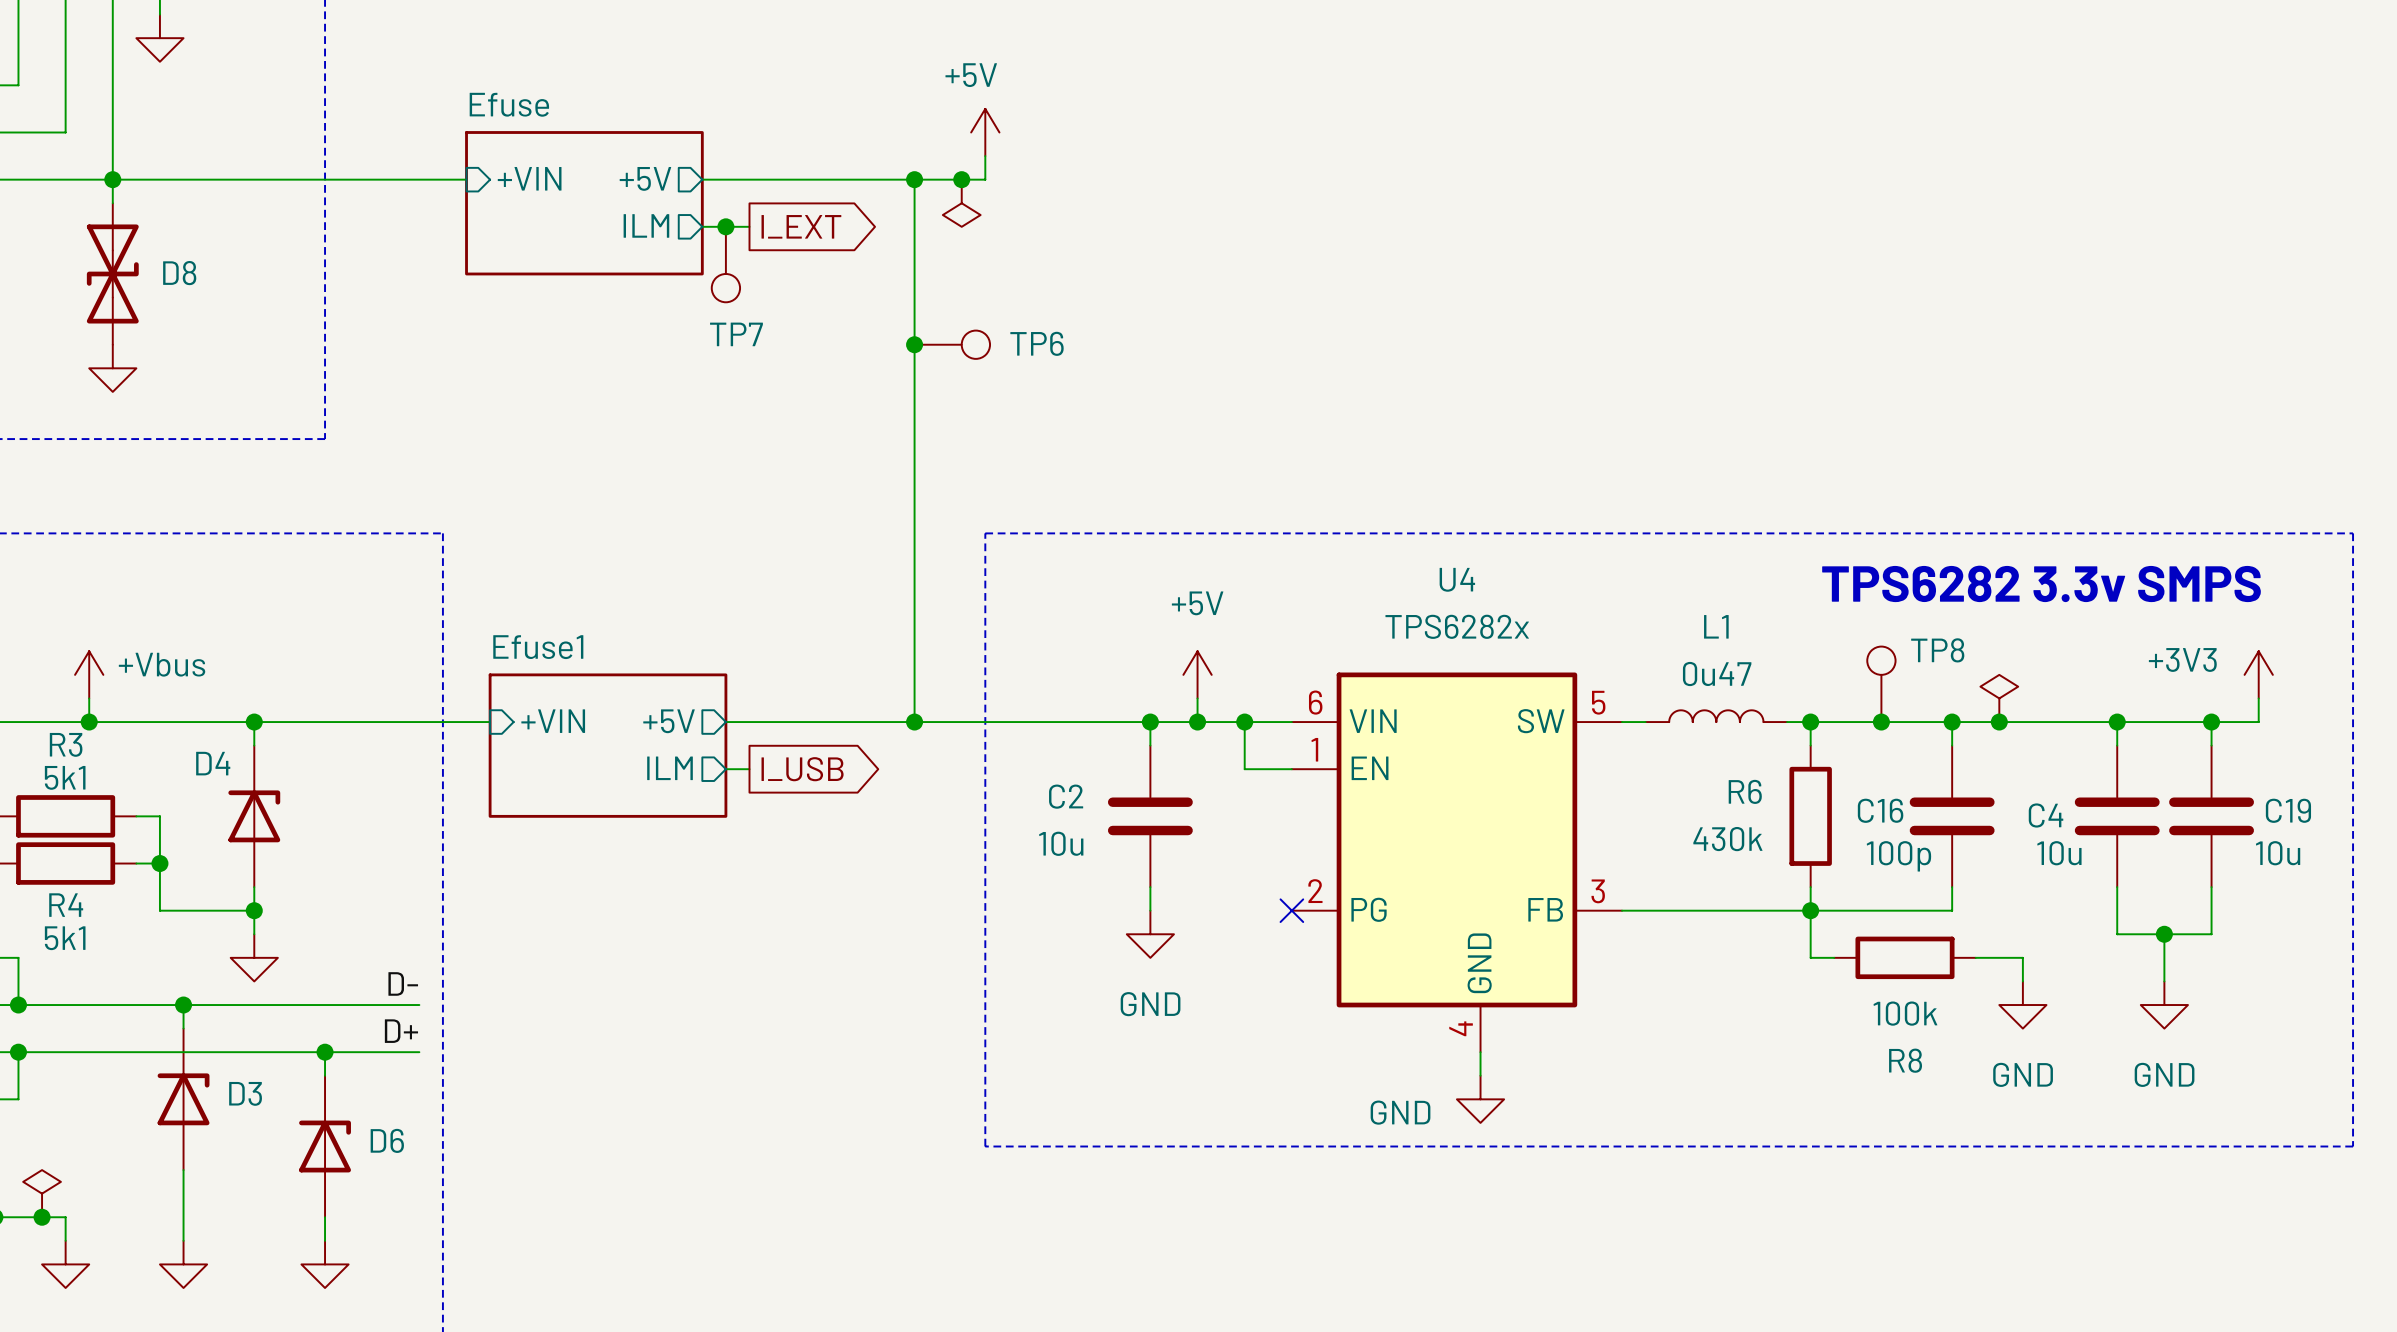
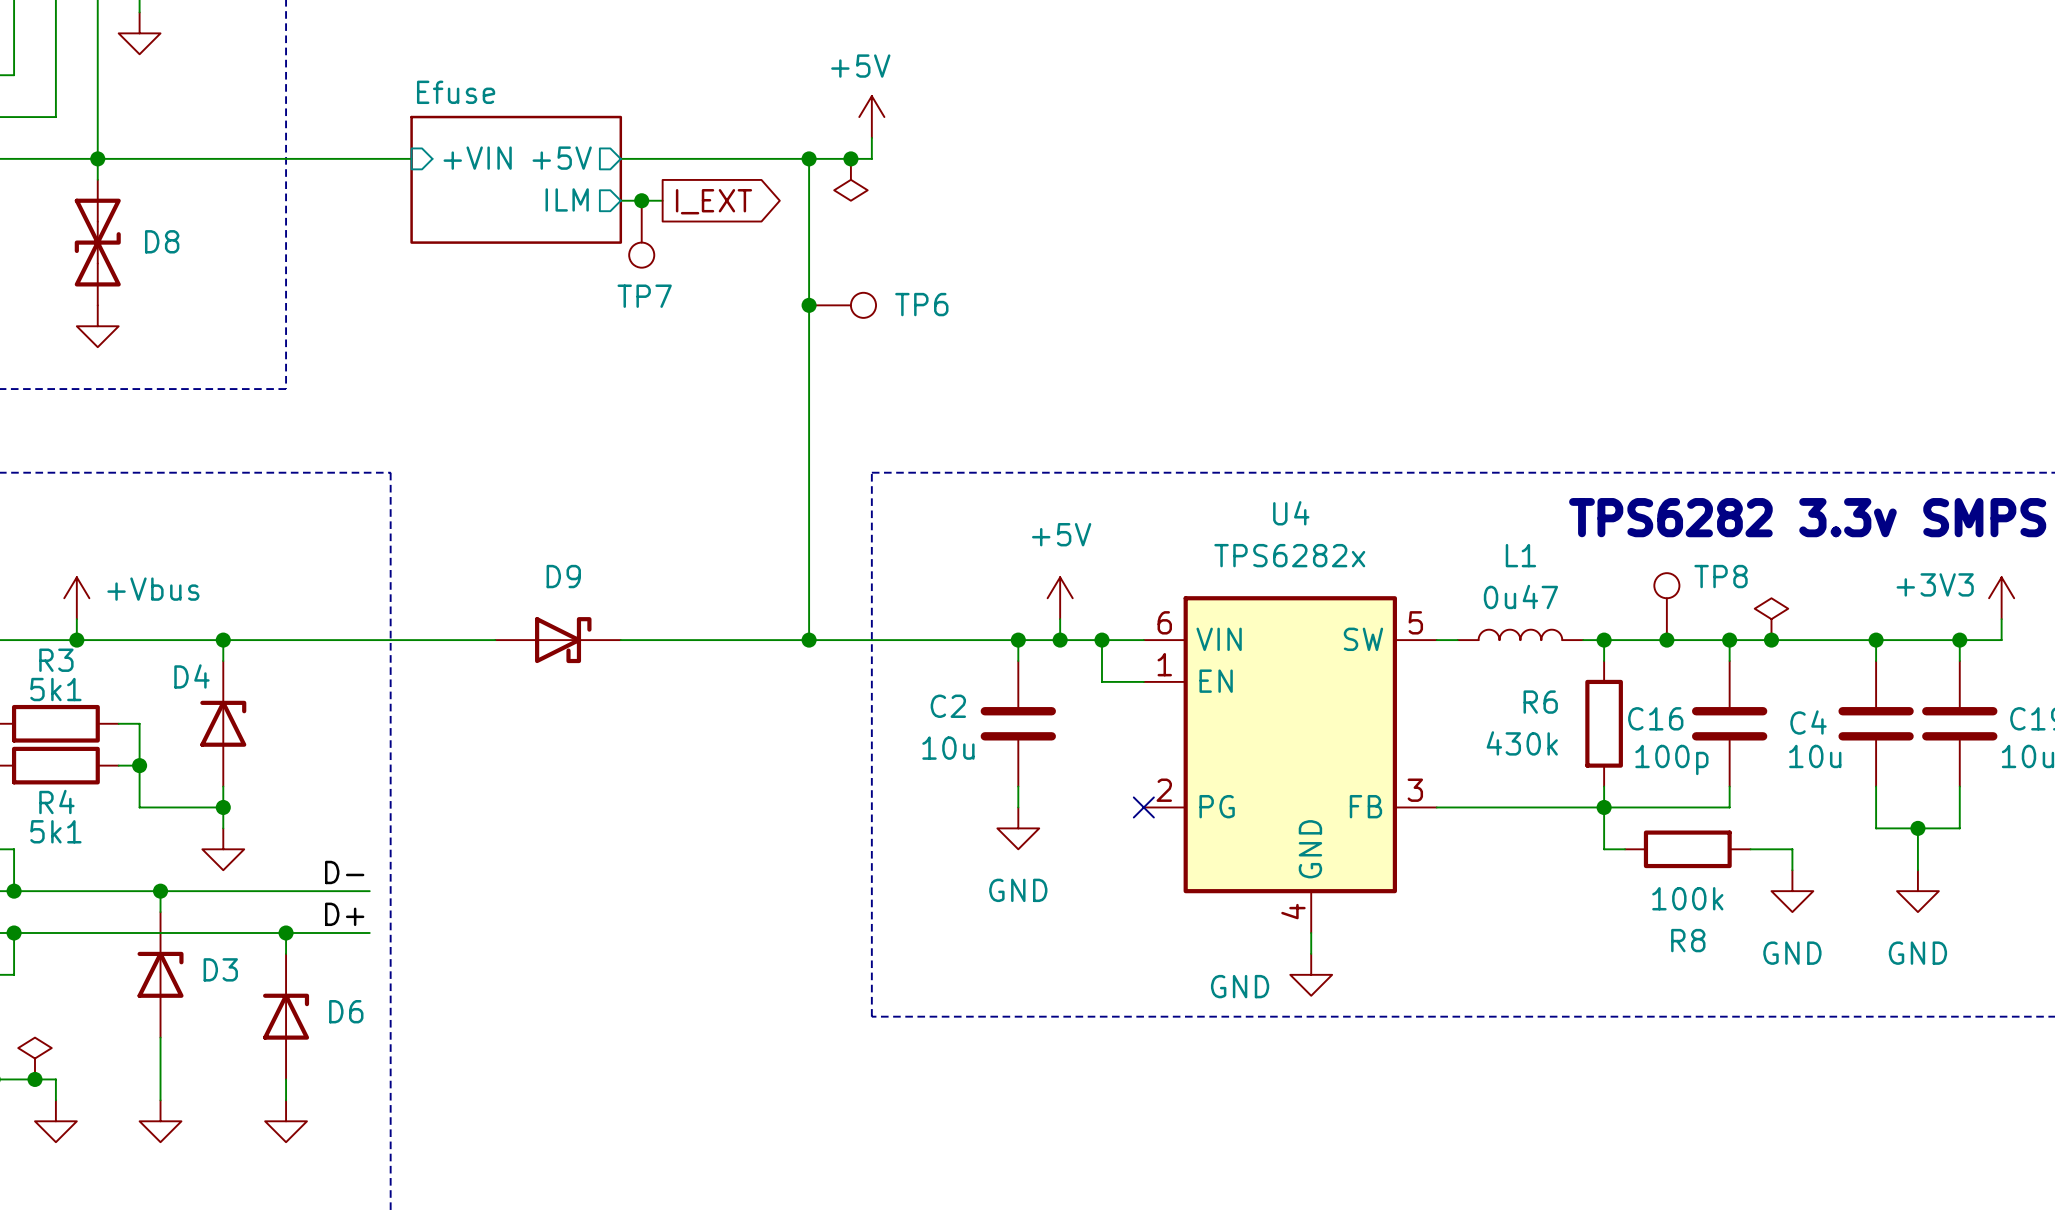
sheet pin: +VIN (553, 721) -> none
sheet pin: +5V (669, 721) -> none
wire: none -> (432, 640) (495, 640)
D9: none -> (558, 640)
sheet Efuse1: (608, 745) -> none
sheet pin: ILM (670, 768) -> none
wire: (725, 769) (749, 769) -> (620, 640) (641, 640)
global label: I_USB (802, 769) -> none

